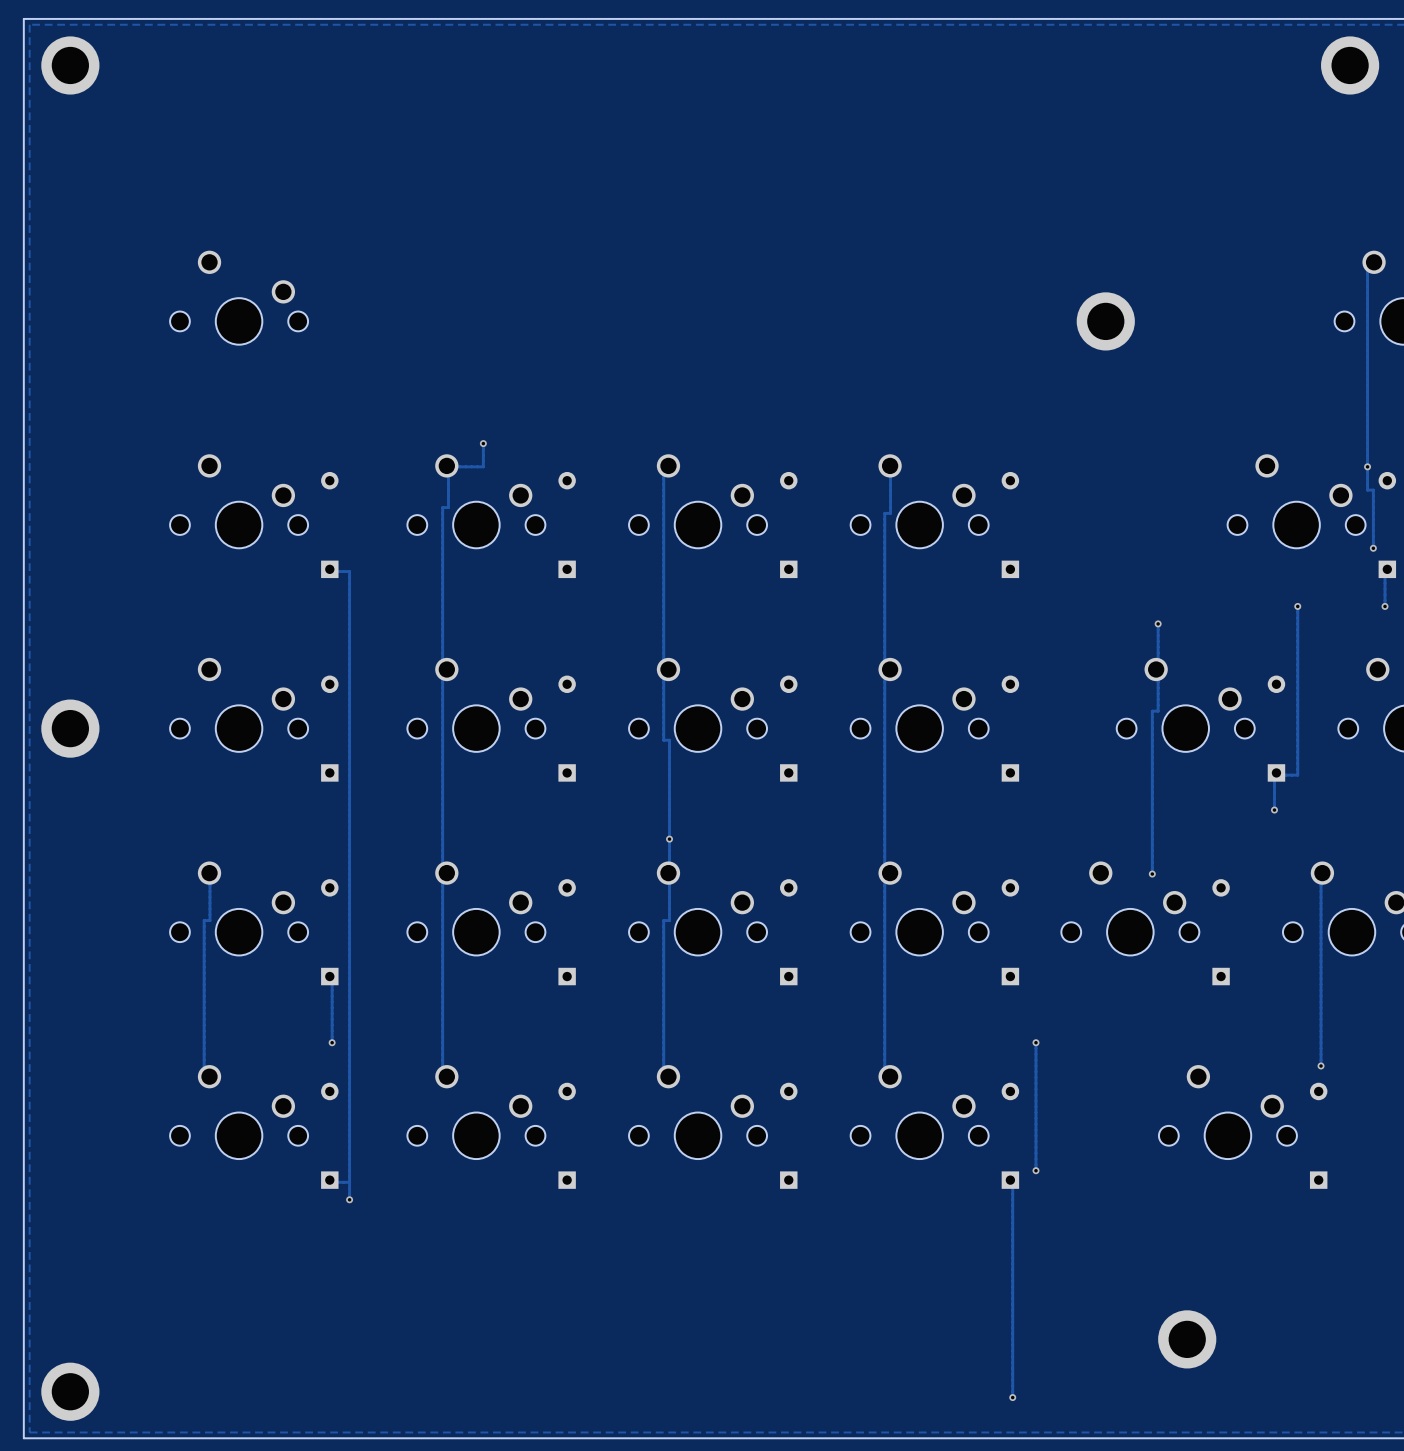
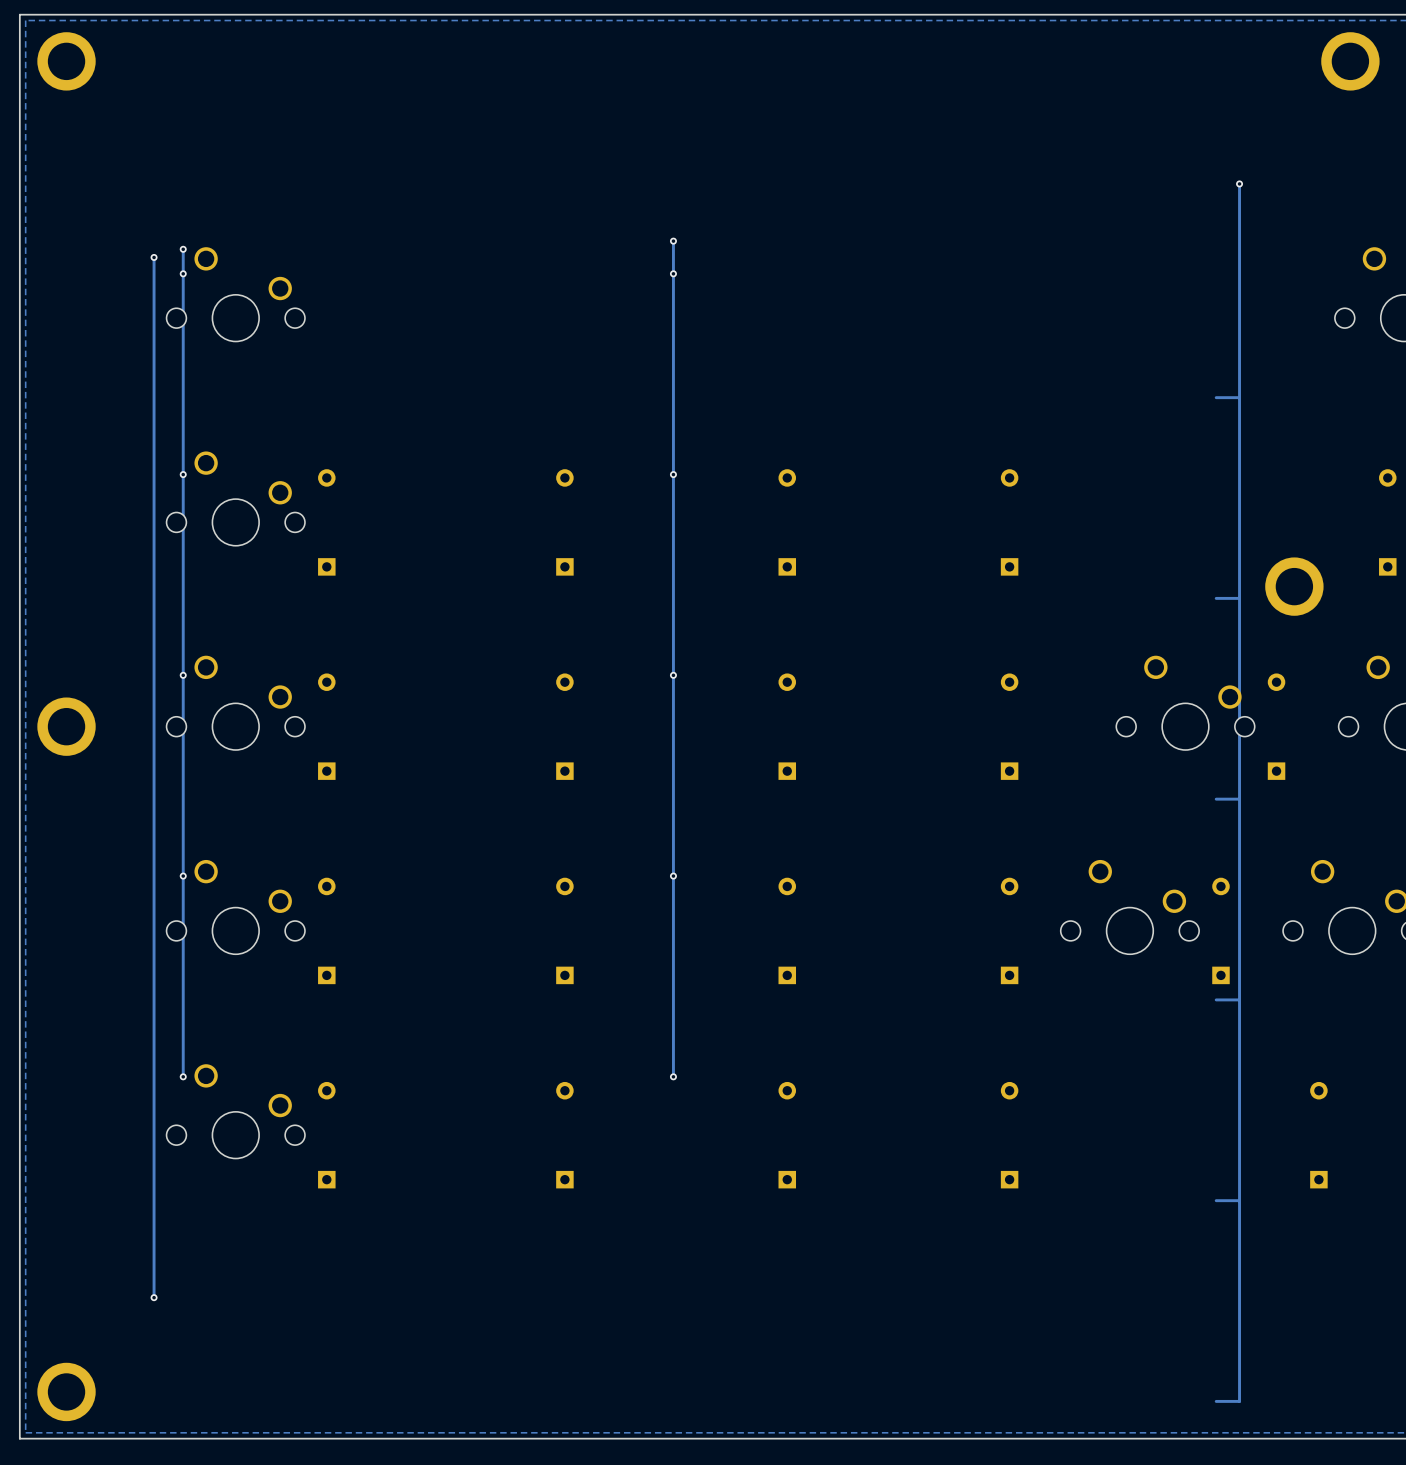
track: none -> (1239, 183) (1239, 1401) (1216, 1401)
via: none -> (1239, 183)
track: none -> (673, 241) (673, 1076)
via: none -> (673, 241)
track: none -> (183, 249) (183, 1076)
via: none -> (183, 249)
track: none -> (154, 257) (154, 1297)
via: none -> (154, 257)
track: (1374, 262) (1367, 263) (1367, 490) (1373, 490) (1373, 548) -> none
via: none -> (183, 273)
via: none -> (673, 273)
part: (1105, 321) -> none
track: none -> (1239, 397) (1216, 397)
track: (483, 443) (483, 466) (446, 465) (448, 507) (442, 507) (442, 1077) (446, 1076) -> none
via: (483, 443) -> none
track: (668, 465) (663, 466) (663, 740) (669, 740) (669, 920) (663, 920) (663, 1077) (668, 1076) -> none
track: (890, 465) (890, 513) (884, 513) (884, 1077) (890, 1076) -> none
via: (1367, 466) -> none
via: none -> (183, 474)
via: none -> (673, 474)
part: (476, 501) -> none
part: (698, 501) -> none
part: (919, 501) -> none
part: (1296, 501) -> none
via: (1373, 548) -> none
track: (329, 569) (349, 571) (349, 1199) -> none
track: (1387, 569) (1385, 577) (1385, 606) -> none
part: none -> (1294, 586)
track: none -> (1239, 598) (1216, 598)
track: (1297, 606) (1297, 775) (1280, 775) (1276, 772) (1274, 780) (1274, 810) -> none
via: (1297, 606) -> none
via: (1385, 606) -> none
track: (1158, 623) (1158, 664) (1156, 669) (1158, 676) (1158, 711) (1152, 711) (1152, 874) -> none
via: (1158, 623) -> none
via: none -> (183, 675)
via: none -> (673, 675)
part: (476, 704) -> none
part: (698, 704) -> none
part: (919, 704) -> none
track: none -> (1239, 799) (1216, 799)
via: (1274, 810) -> none
via position: (669, 839) -> (673, 876)
track: (209, 873) (209, 920) (204, 920) (204, 1077) (209, 1076) -> none
track: (1322, 873) (1321, 1065) -> none
via: (1152, 874) -> none
via: none -> (183, 876)
part: (476, 908) -> none
part: (698, 908) -> none
part: (919, 908) -> none
track: (329, 976) (332, 984) (332, 1042) -> none
track: none -> (1239, 999) (1216, 999)
via: (332, 1042) -> none
track: (1035, 1042) (1035, 1170) -> none
via: (1035, 1042) -> none
via: (1321, 1065) -> none
via: none -> (183, 1076)
via: none -> (673, 1076)
part: (476, 1112) -> none
part: (698, 1112) -> none
part: (919, 1112) -> none
part: (1227, 1112) -> none
via: (1035, 1170) -> none
track: (329, 1180) (349, 1182) -> none
track: (1010, 1180) (1012, 1188) (1012, 1397) -> none
via: (349, 1199) -> none
track: none -> (1239, 1200) (1216, 1200)
via: none -> (154, 1297)
part: (1187, 1339) -> none
via: (1012, 1397) -> none

